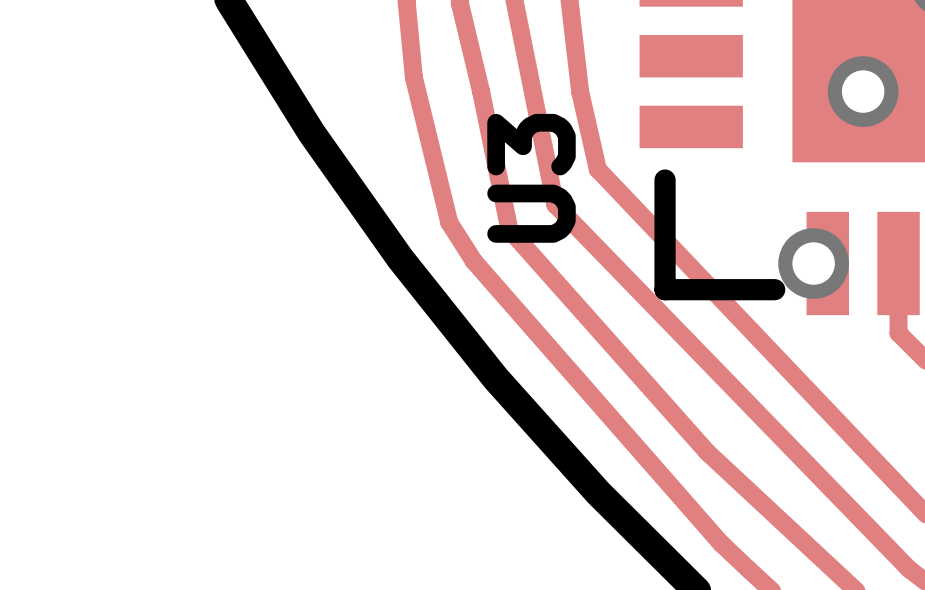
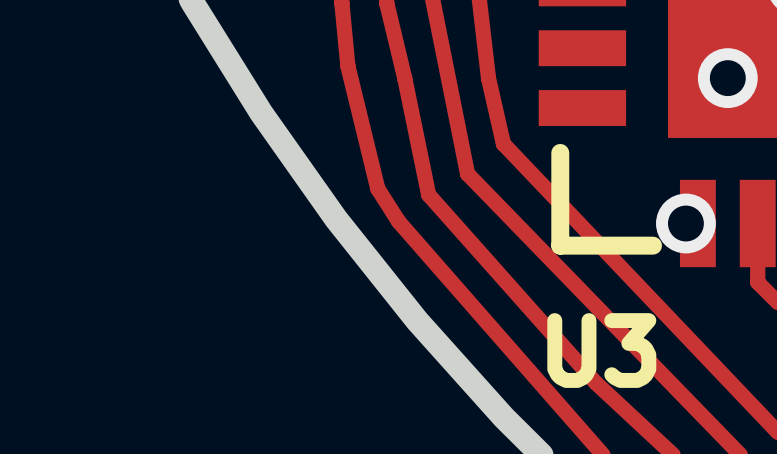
U3 name rotation: 0° (531, 178) -> 90° clockwise (601, 350)
U3 name position: U3 (531, 178) -> U3 (601, 350)

